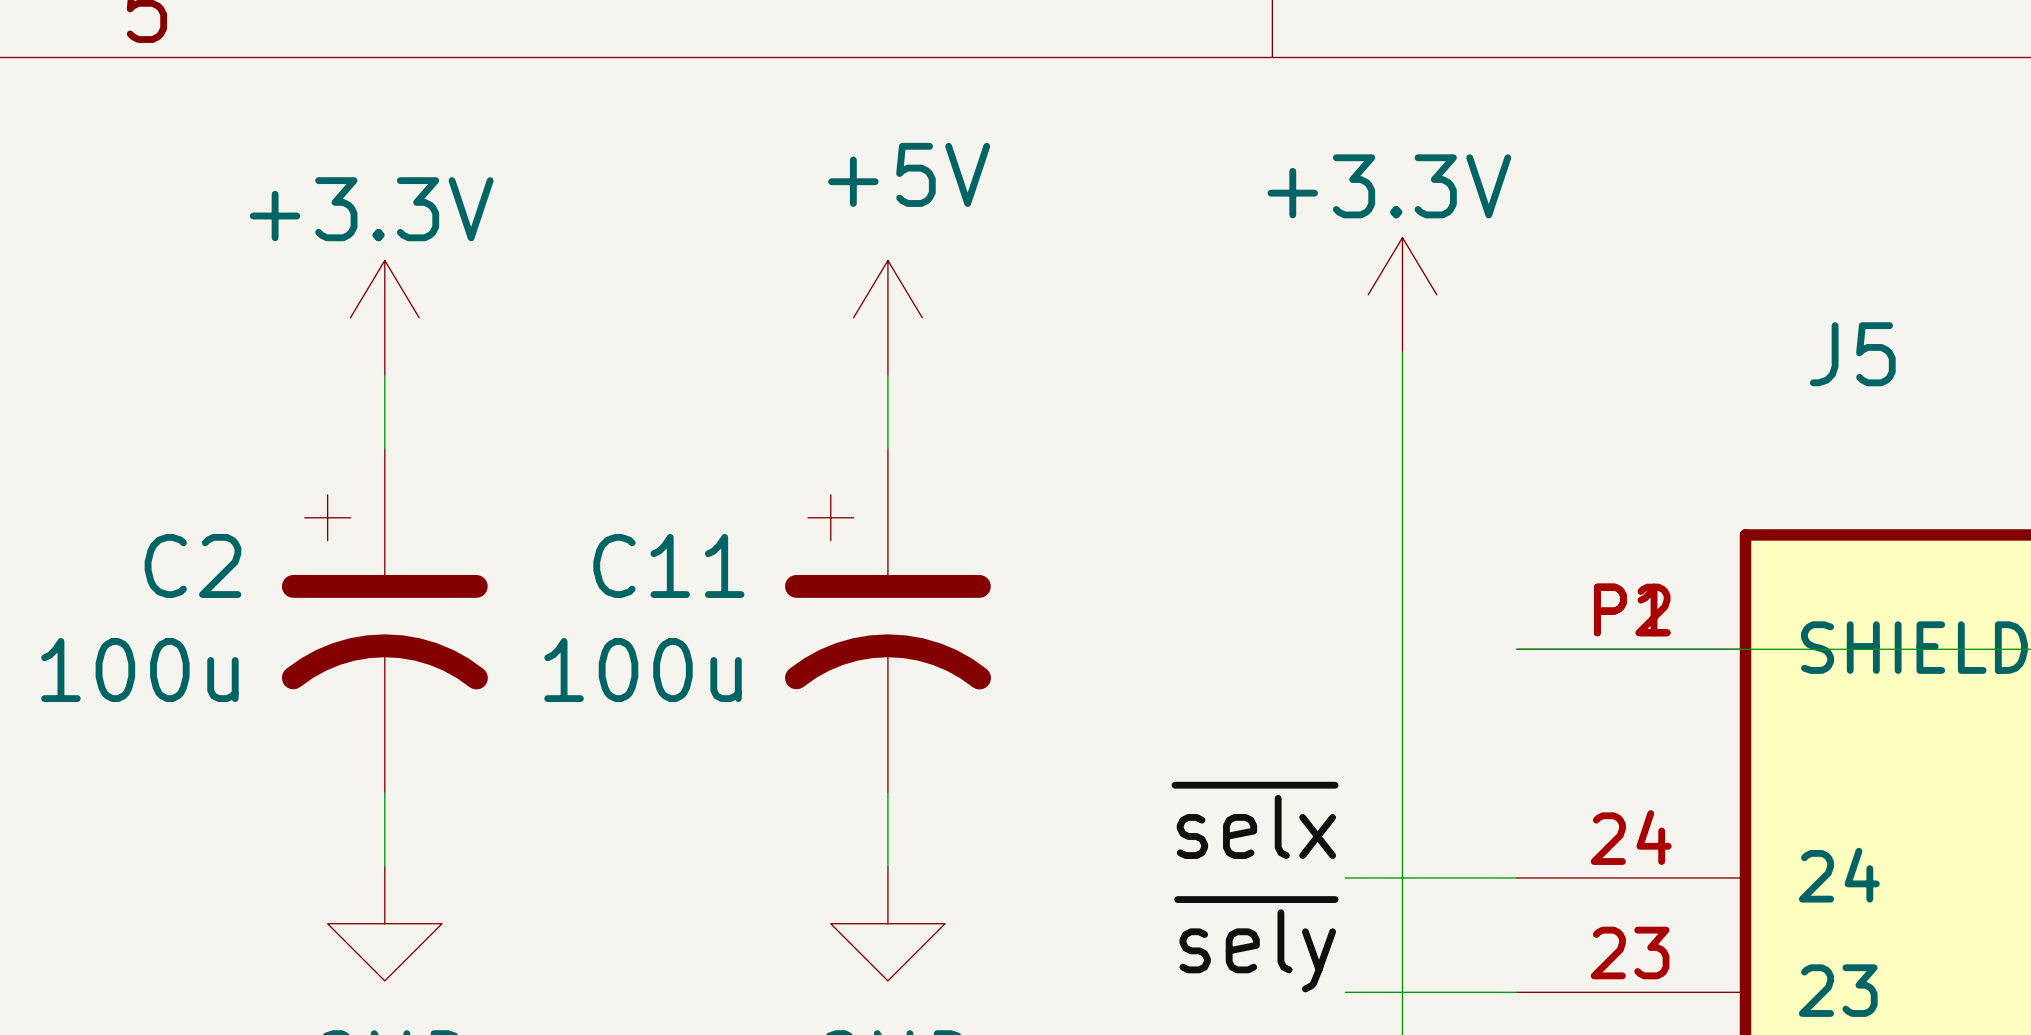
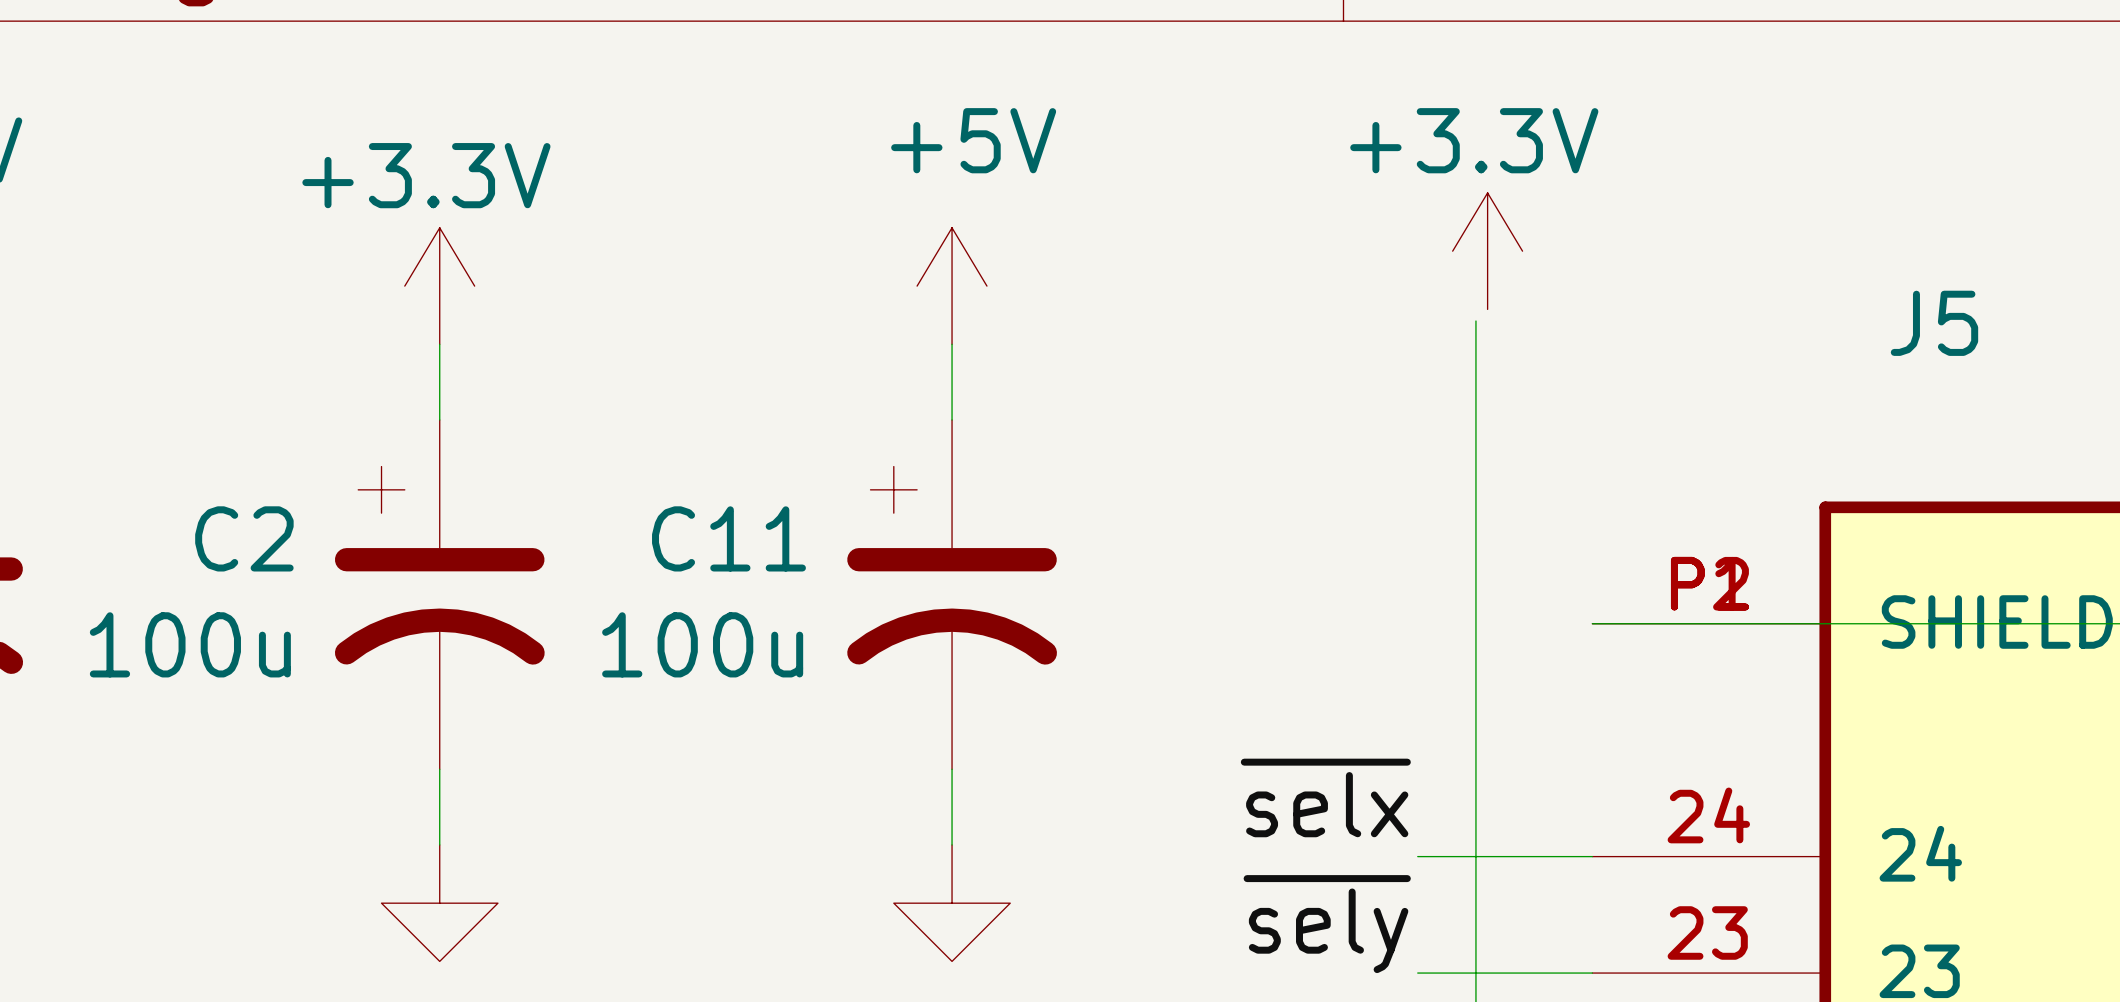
power symbol position: +3.3V (1402, 294) -> +3.3V (1487, 251)

